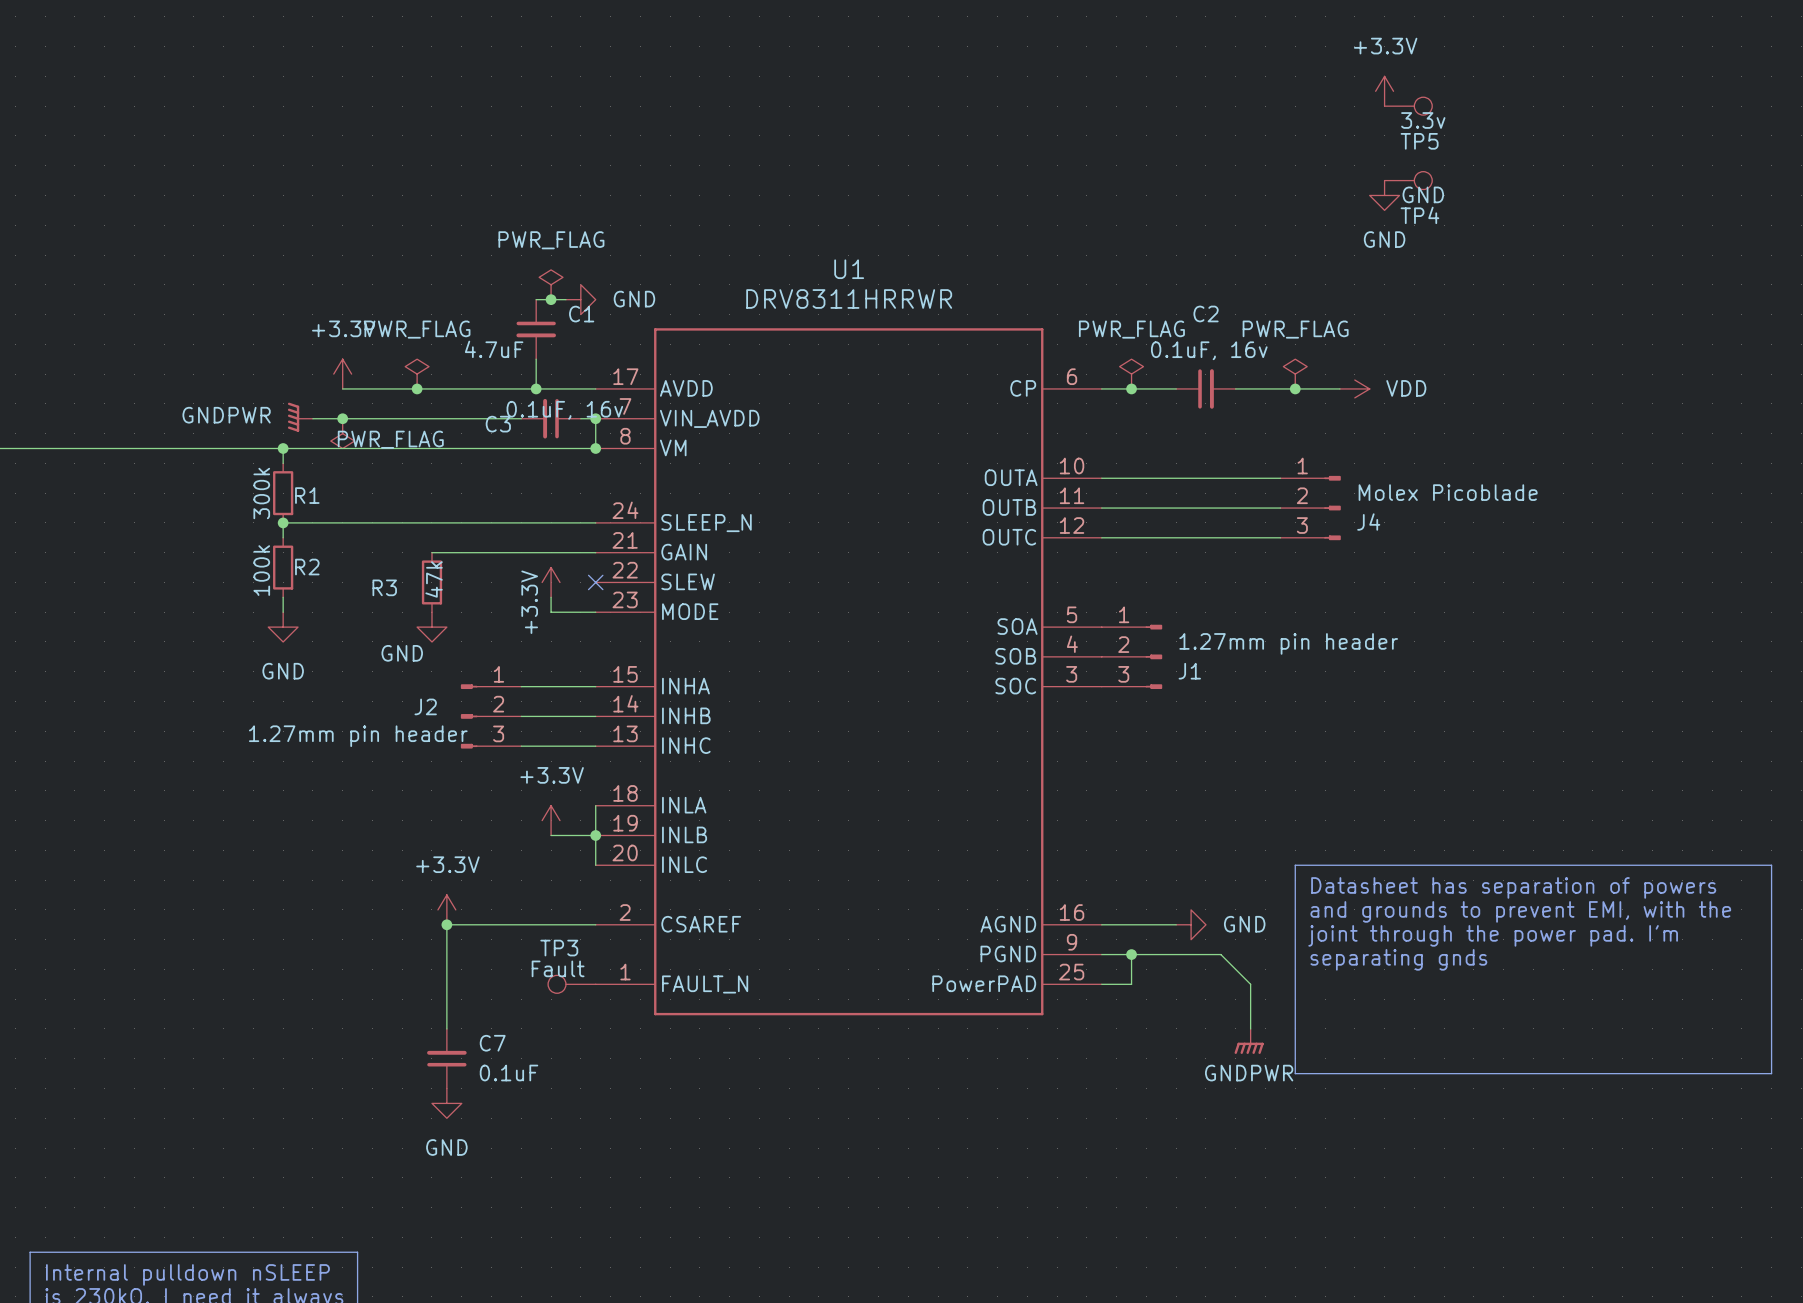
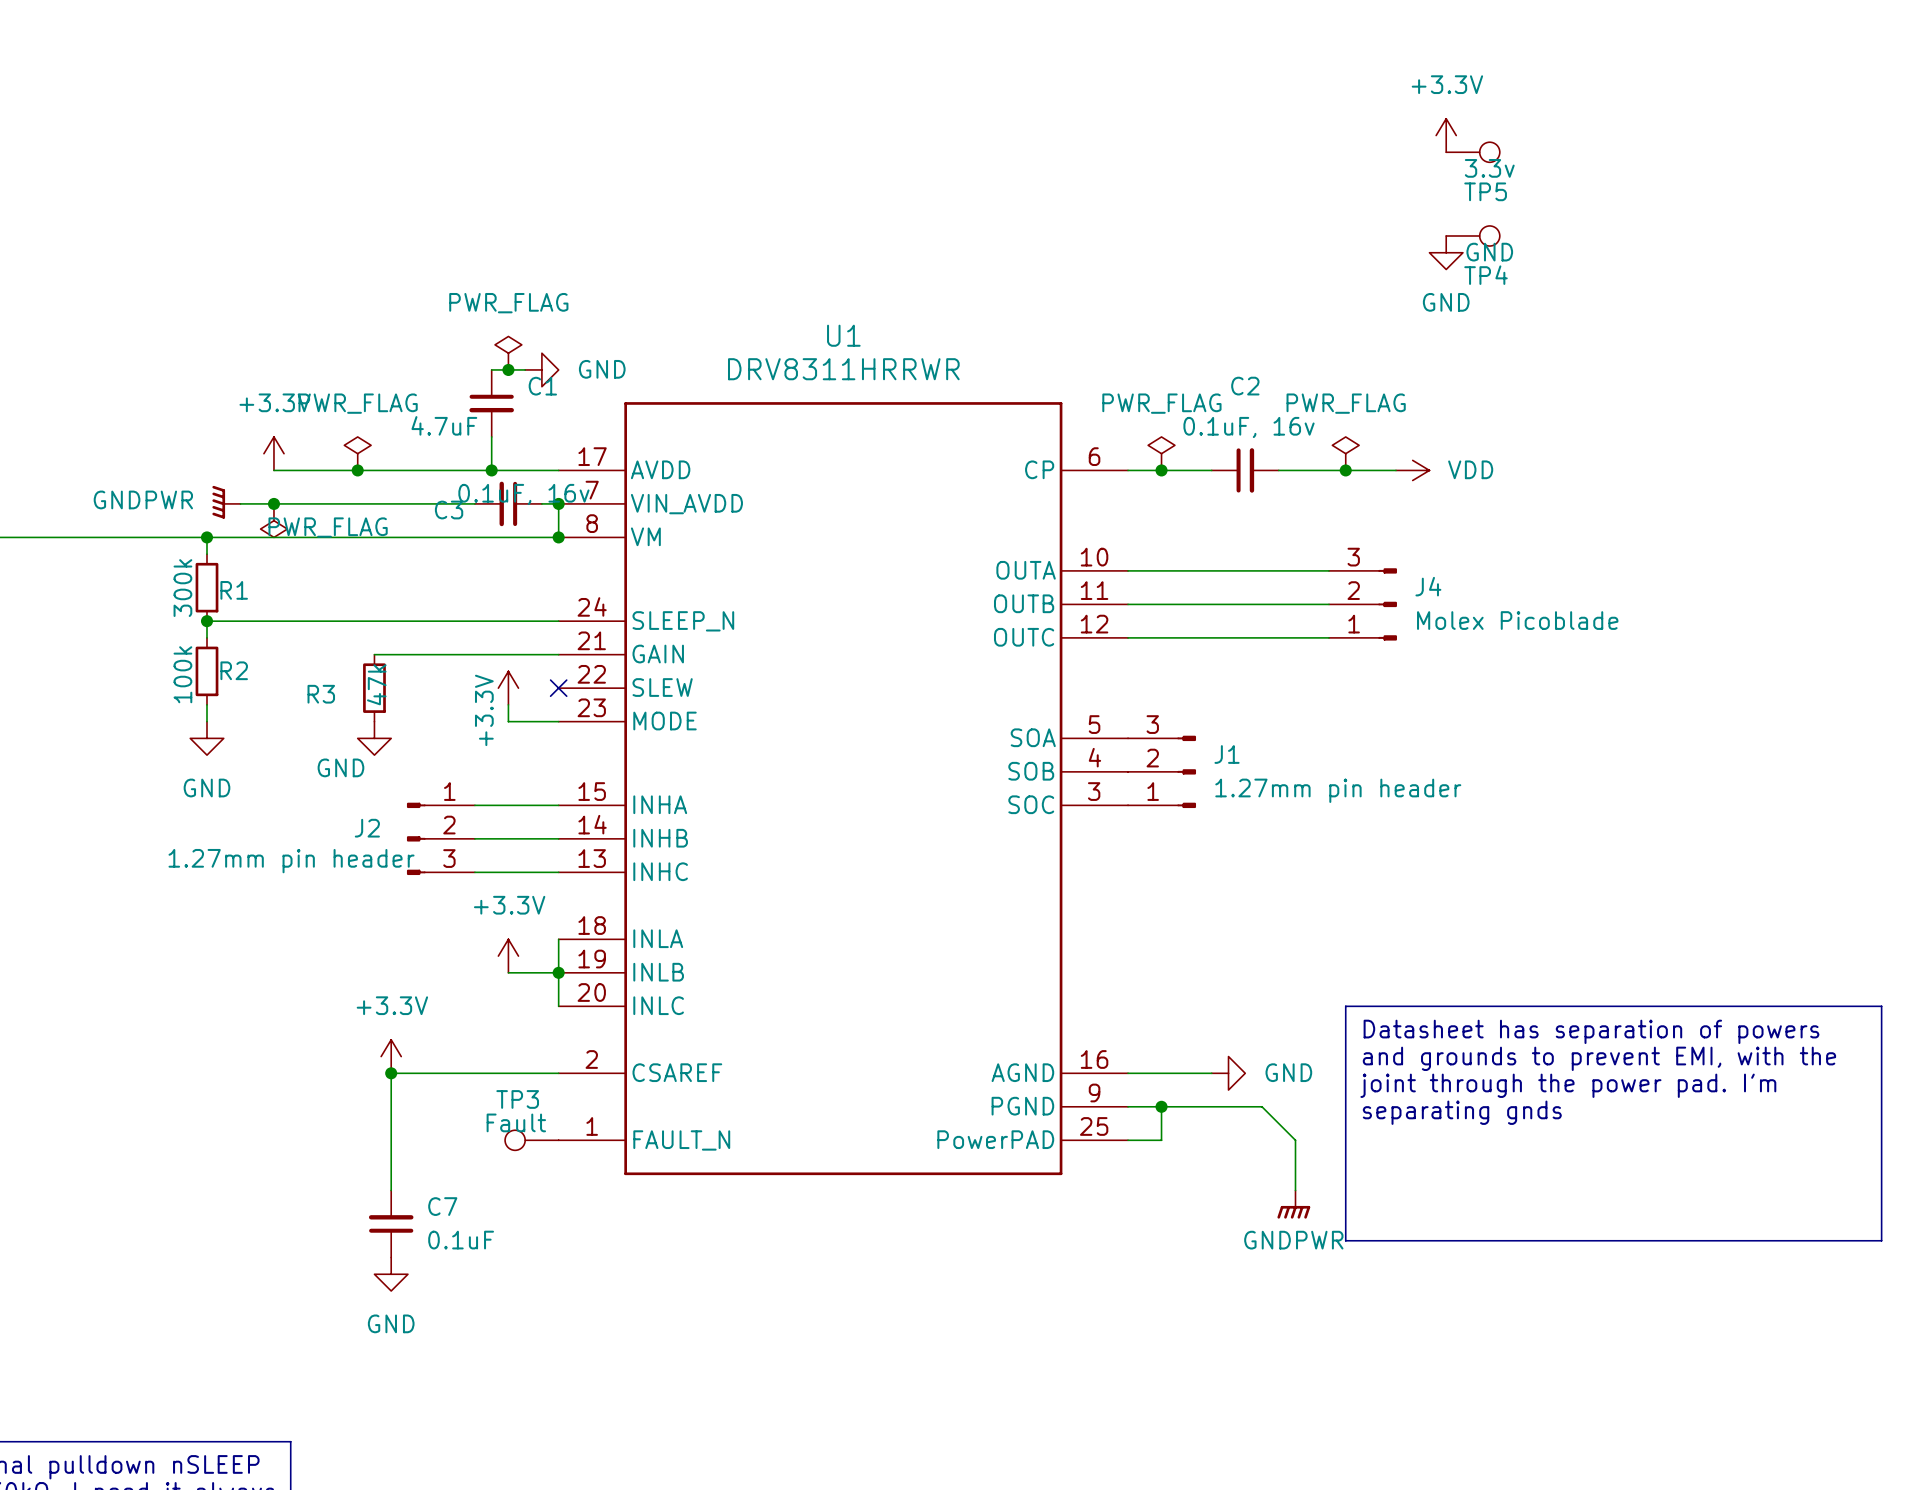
J4 flip: as is (1332, 508) -> up-down (1387, 604)
J1 flip: as is (1153, 656) -> up-down (1186, 771)

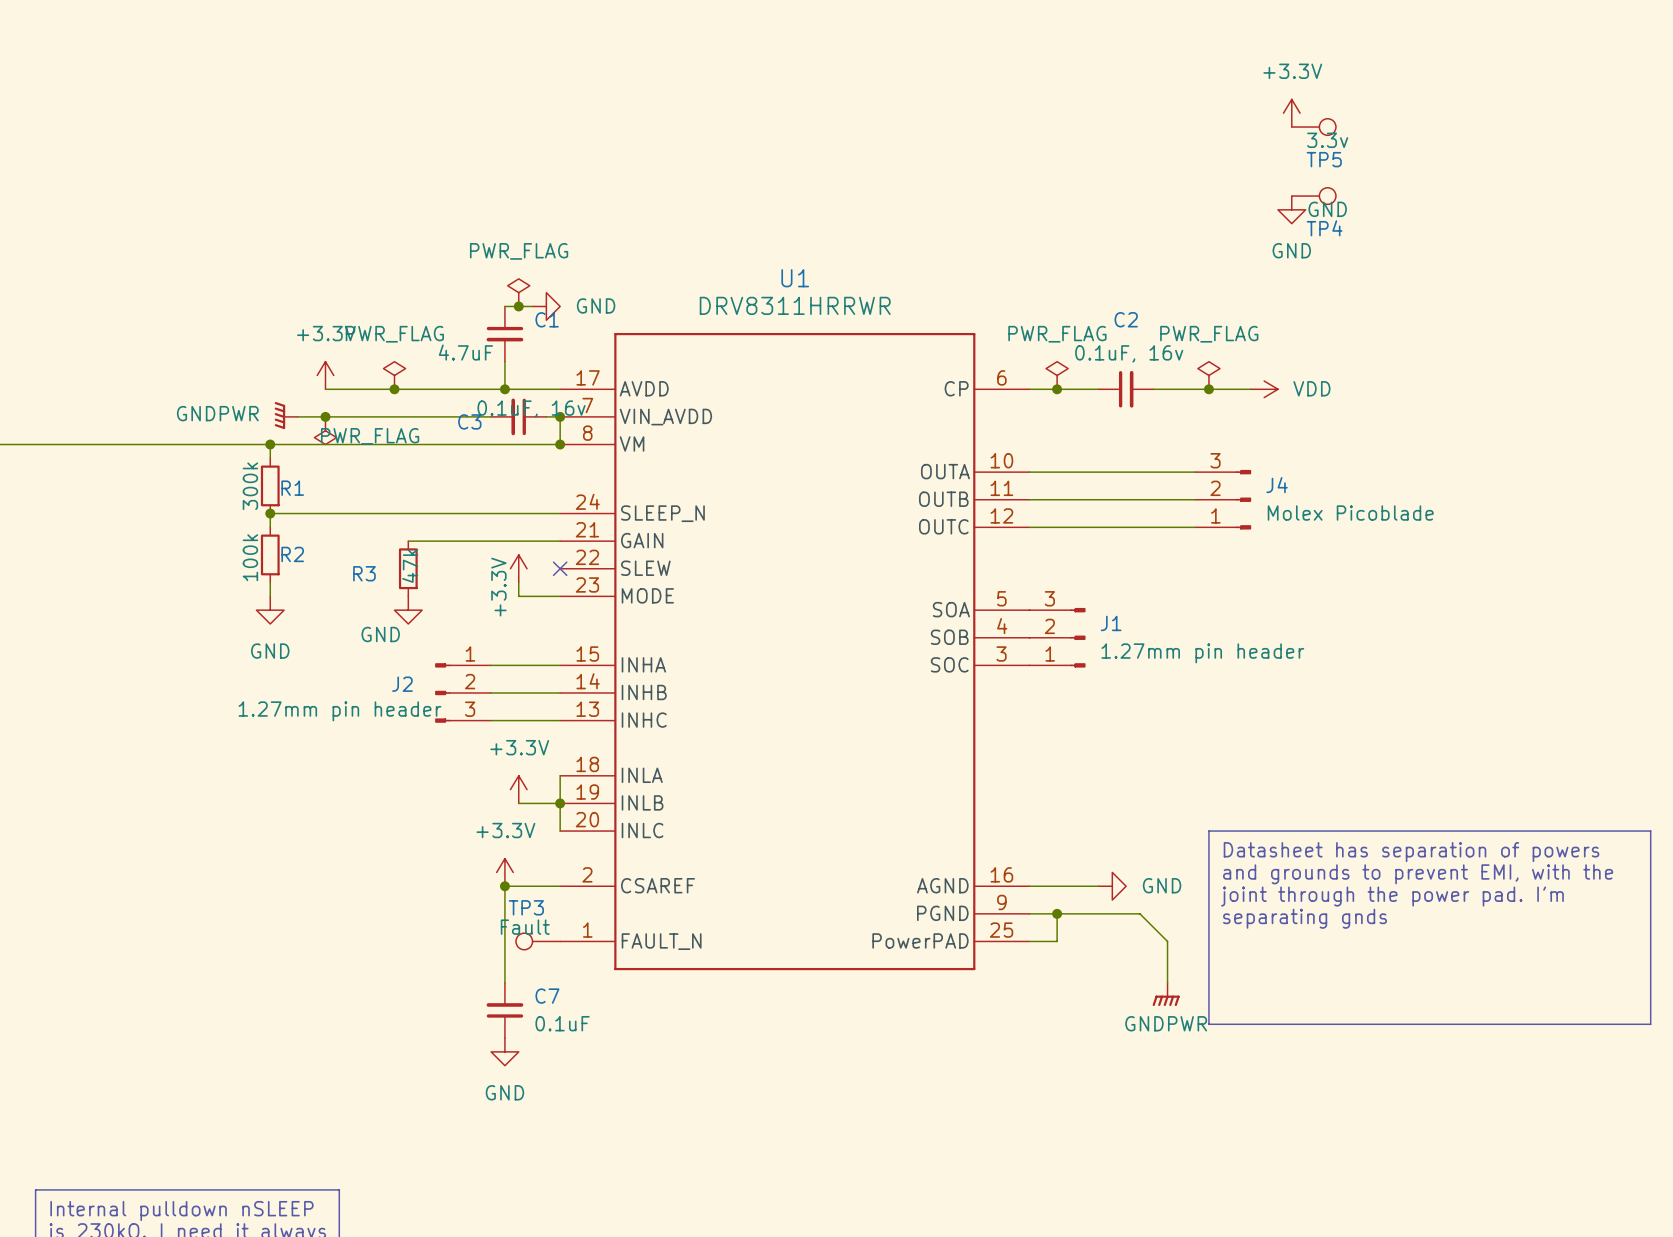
power symbol position: +3.3V (391, 1056) -> +3.3V (504, 872)
junction: (391, 1073) -> none
wire: (491, 1073) (391, 1073) (391, 1190) -> (504, 886) (504, 982)
junction: none -> (504, 886)
C7 position: (391, 1224) -> (504, 1010)
power symbol position: GND (391, 1274) -> GND (504, 1051)

